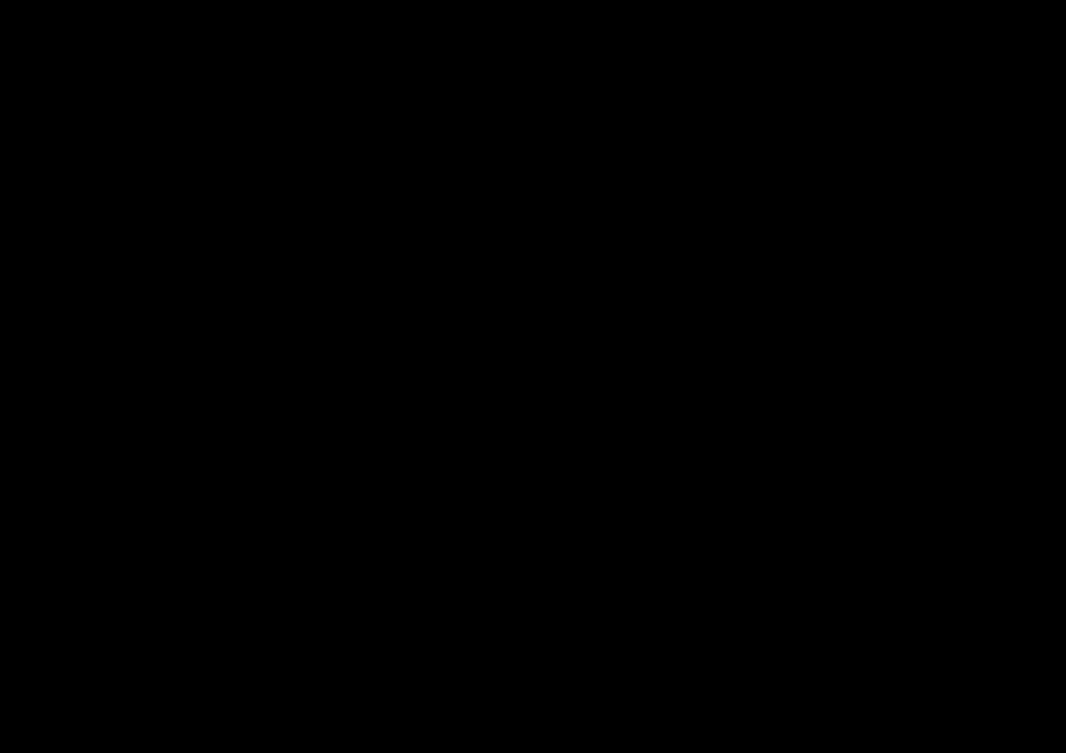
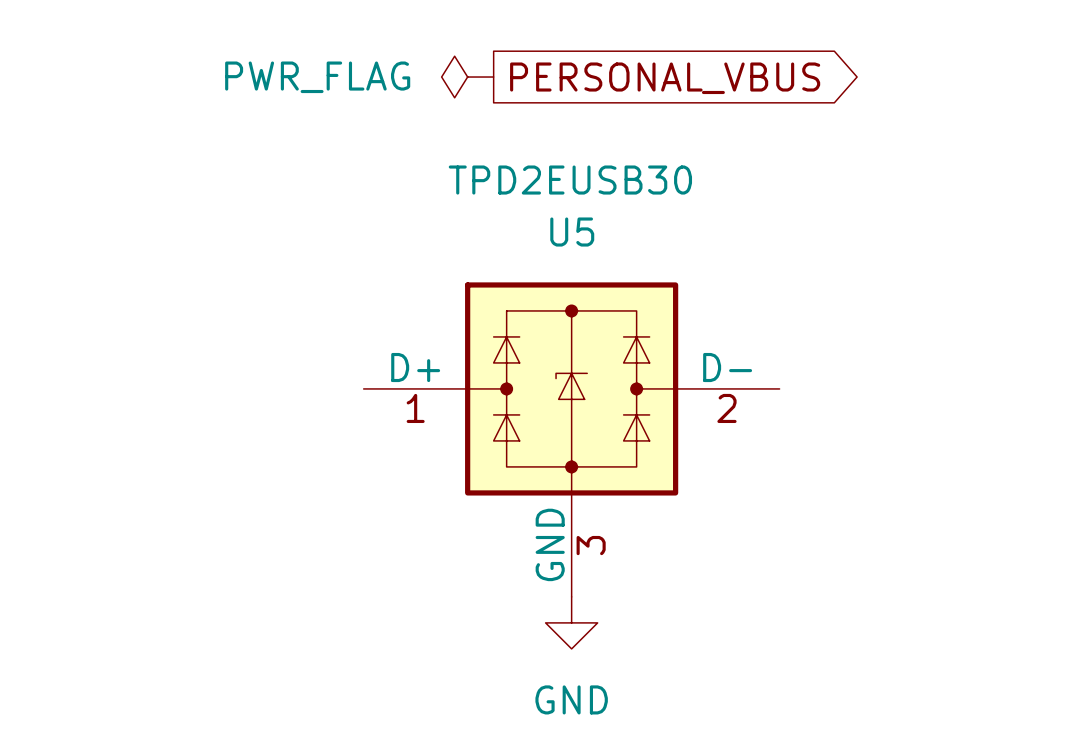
power symbol: none -> PWR_FLAG (467, 77)
global label: none -> PERSONAL_VBUS (665, 78)
U5: none -> TPD2EUSB30 (571, 439)
power symbol: none -> GND (571, 622)

